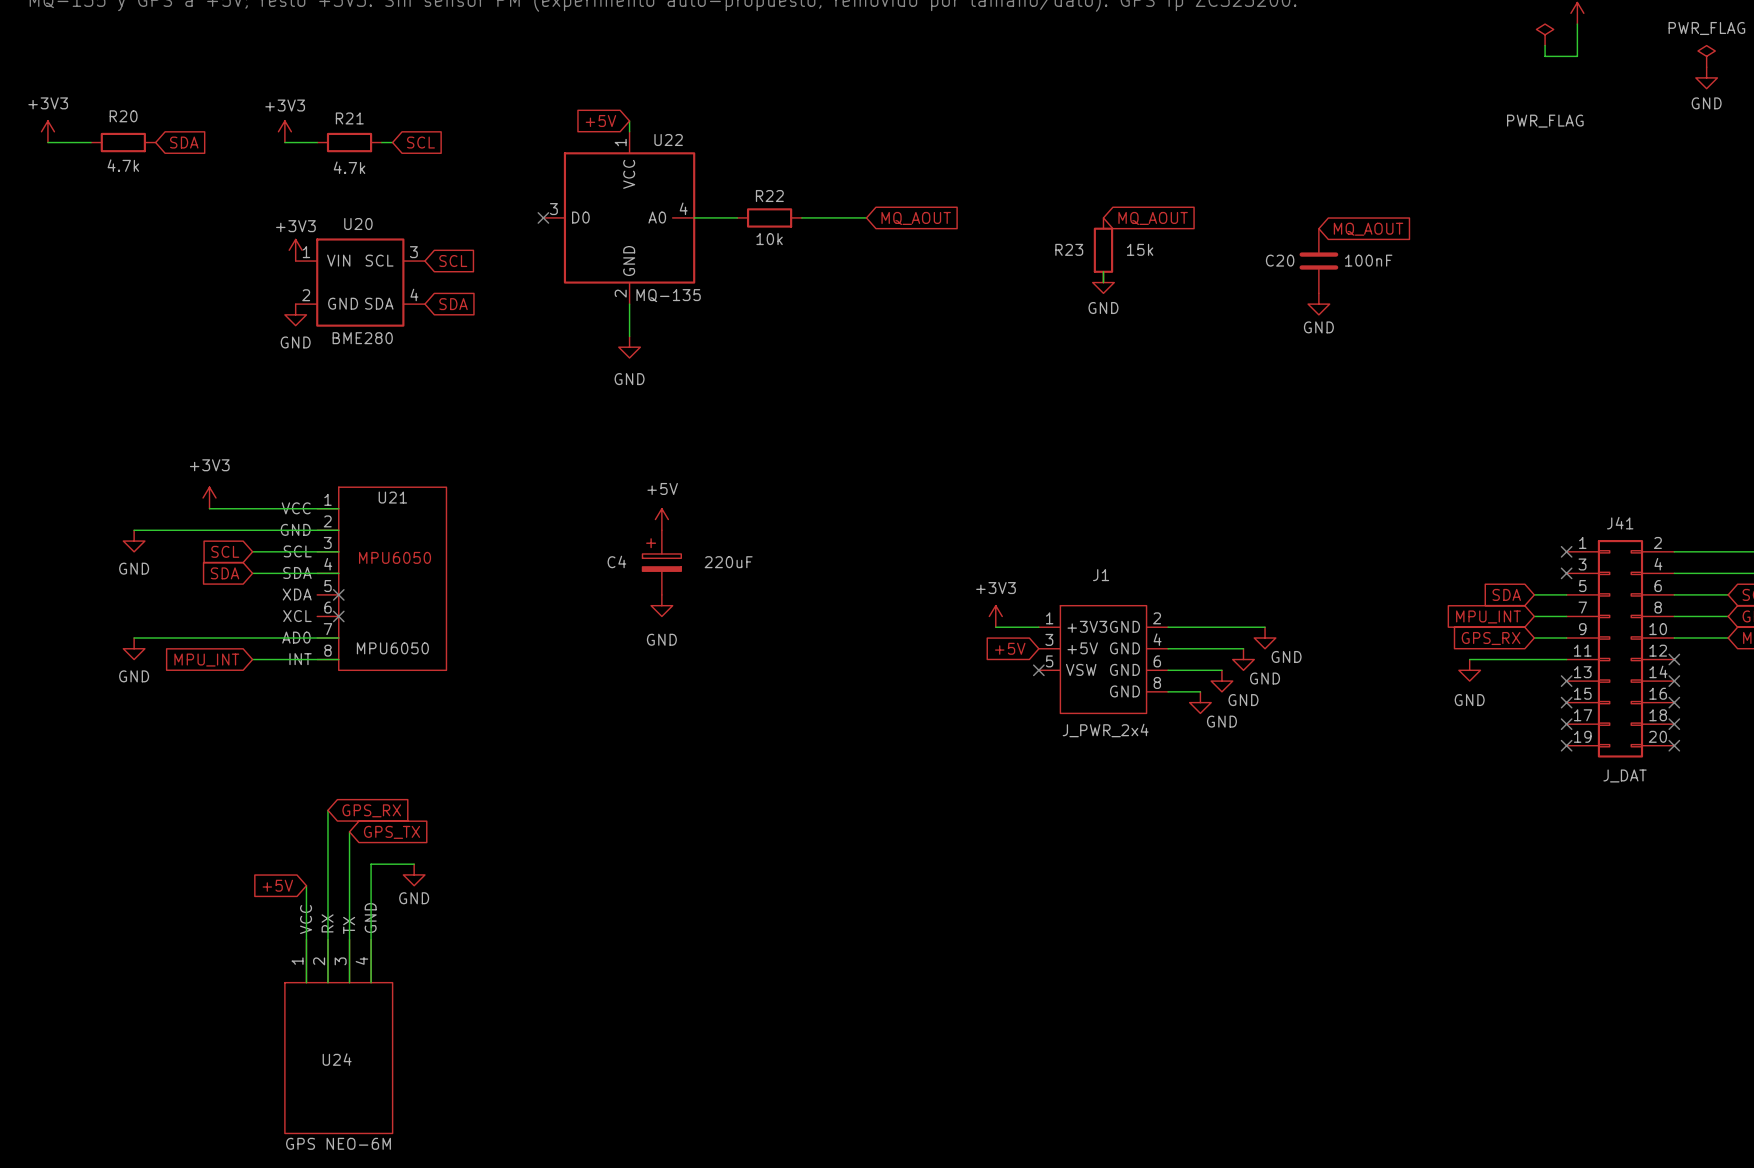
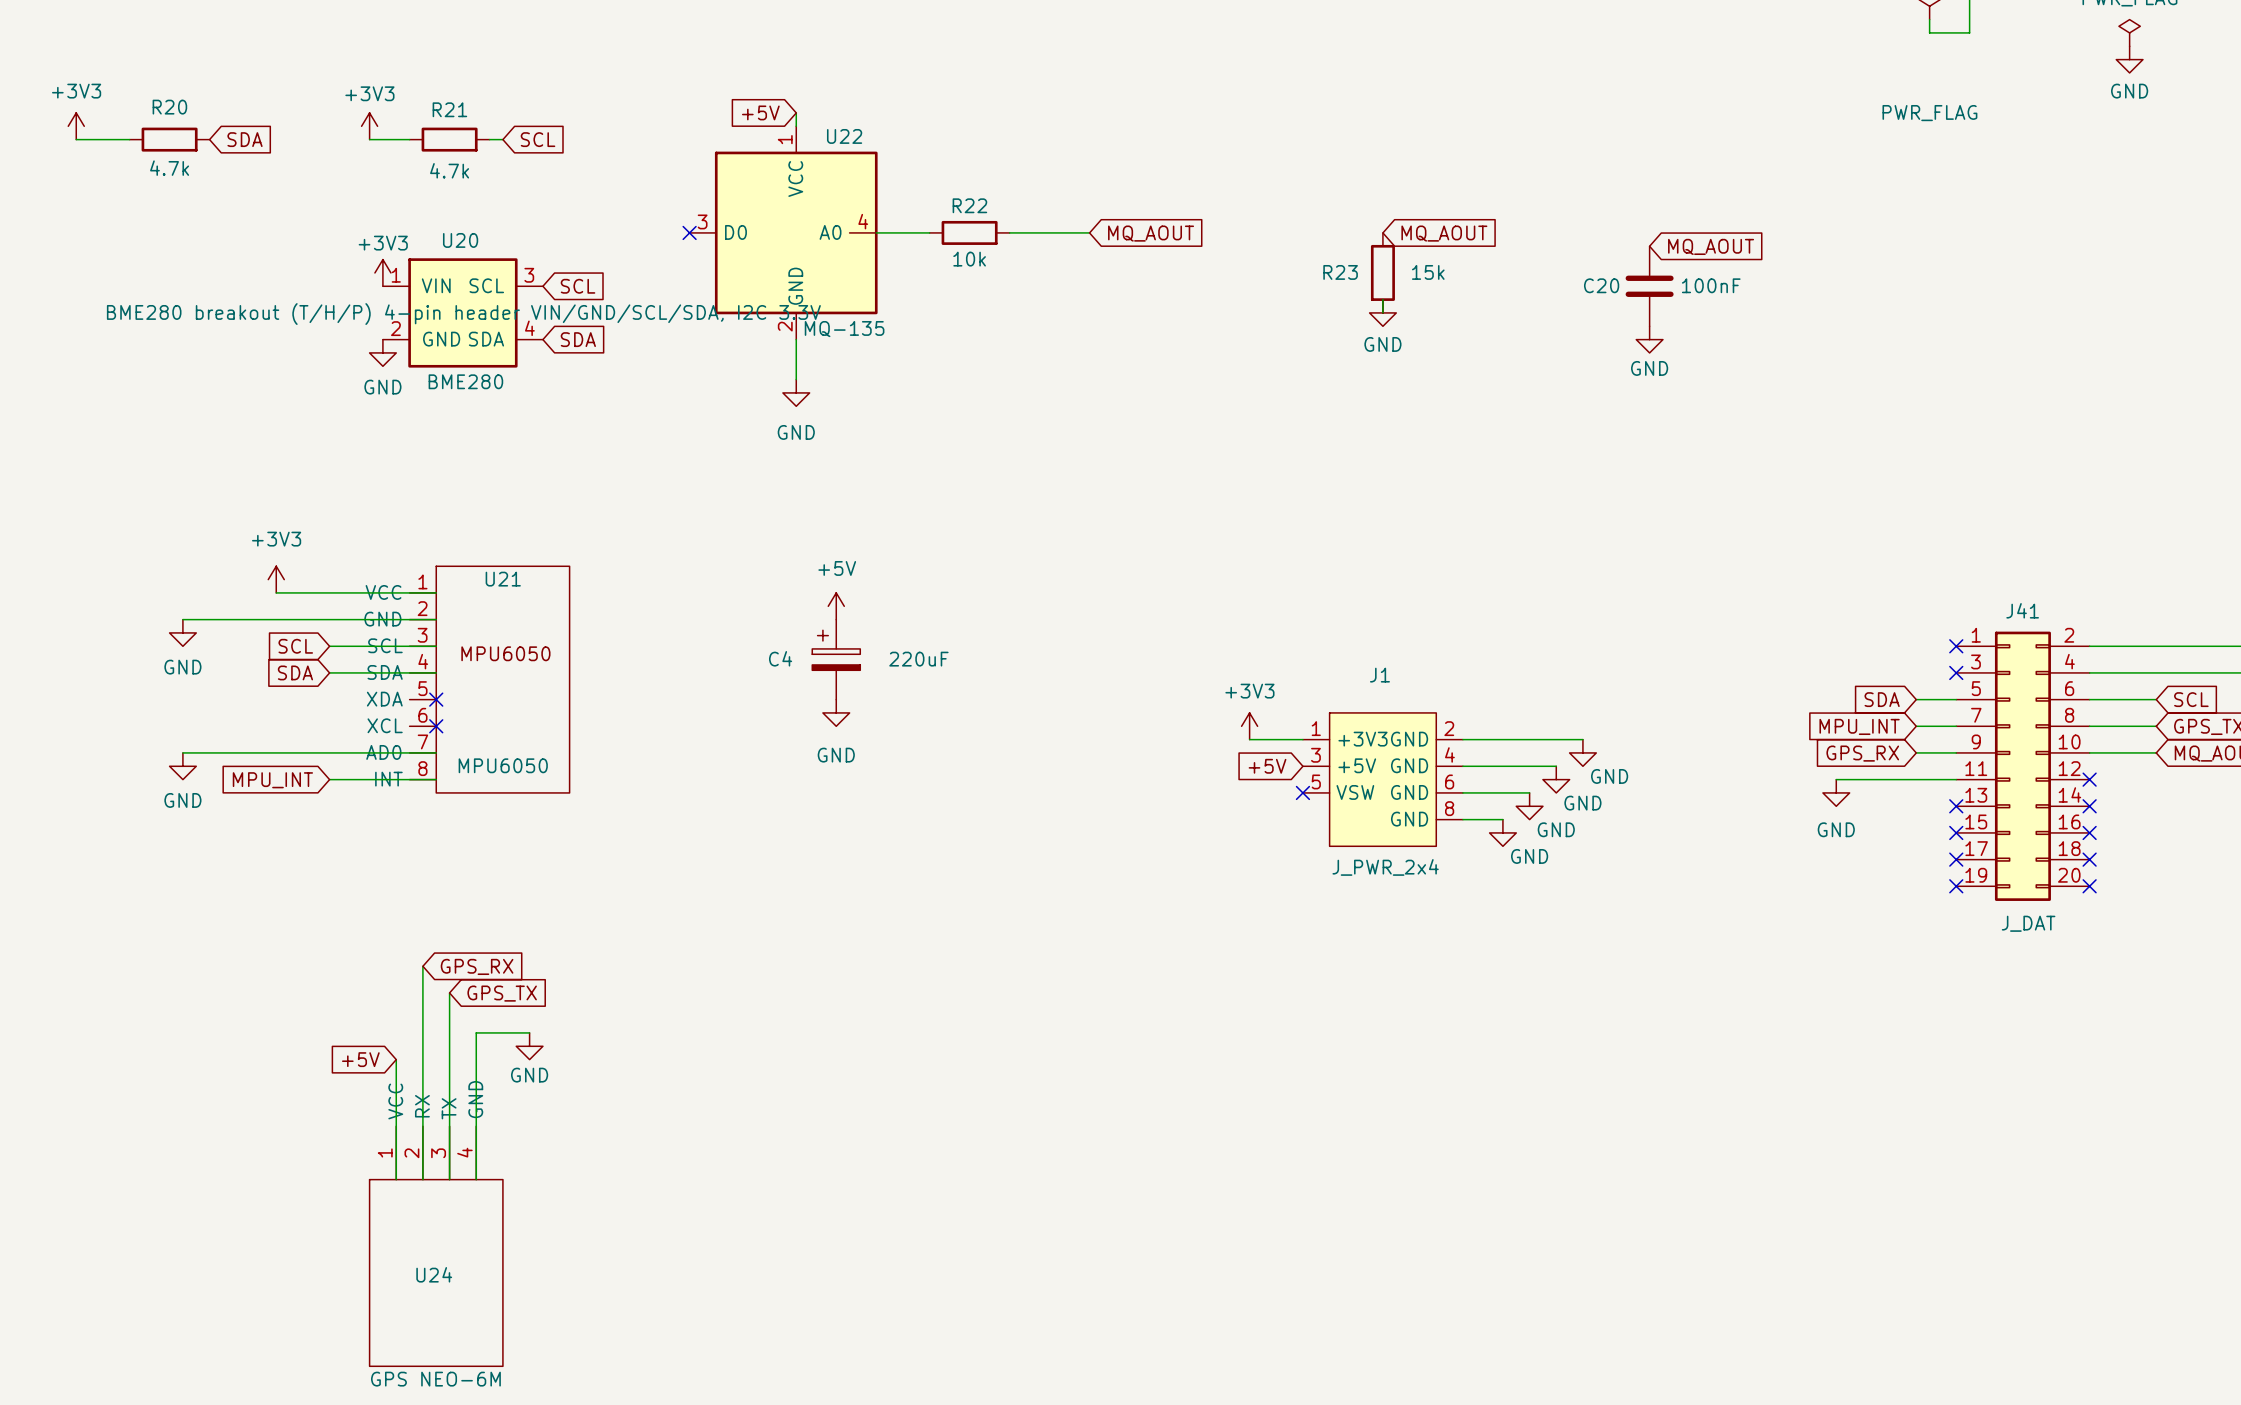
U20 text: none -> BME280 breakout (T/H/P) 4-pin header VIN/GND/SCL/SDA, I2C 3.3V (463, 314)

